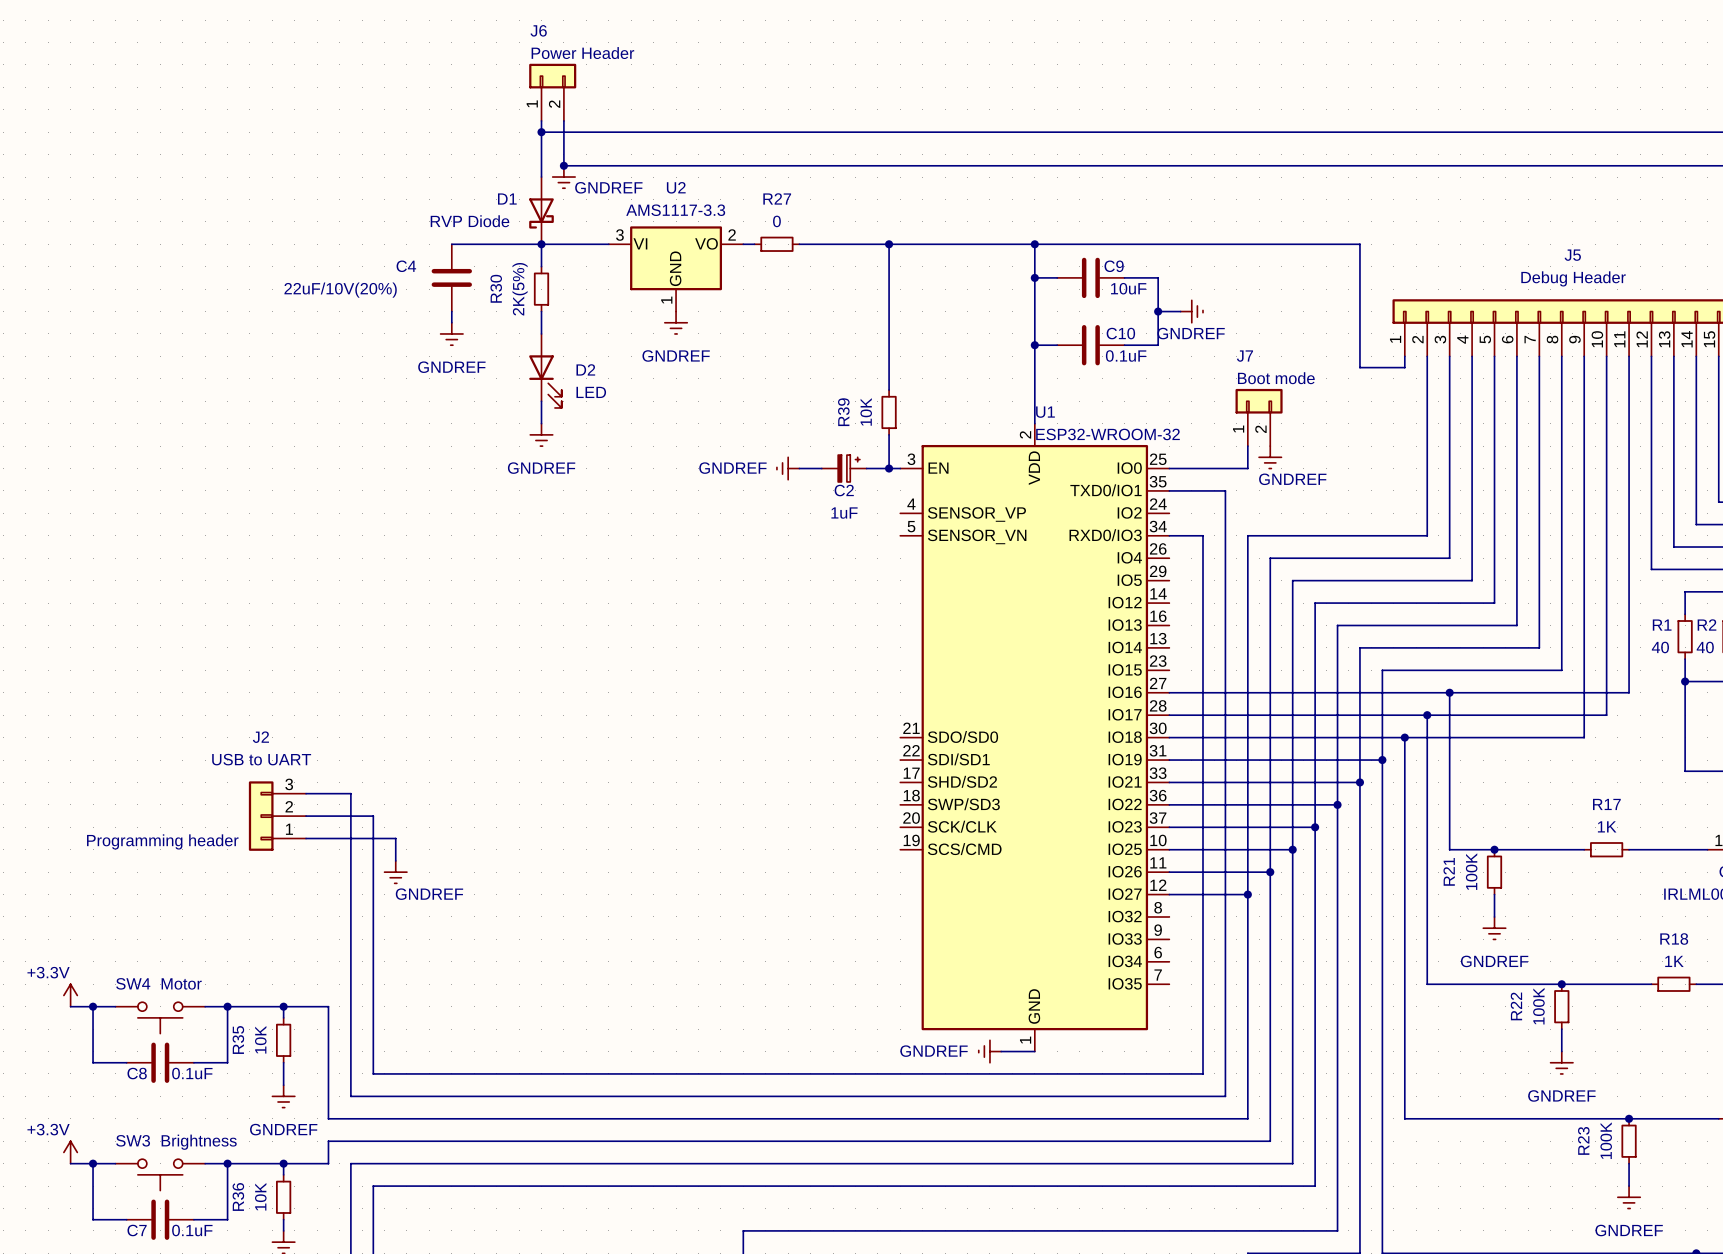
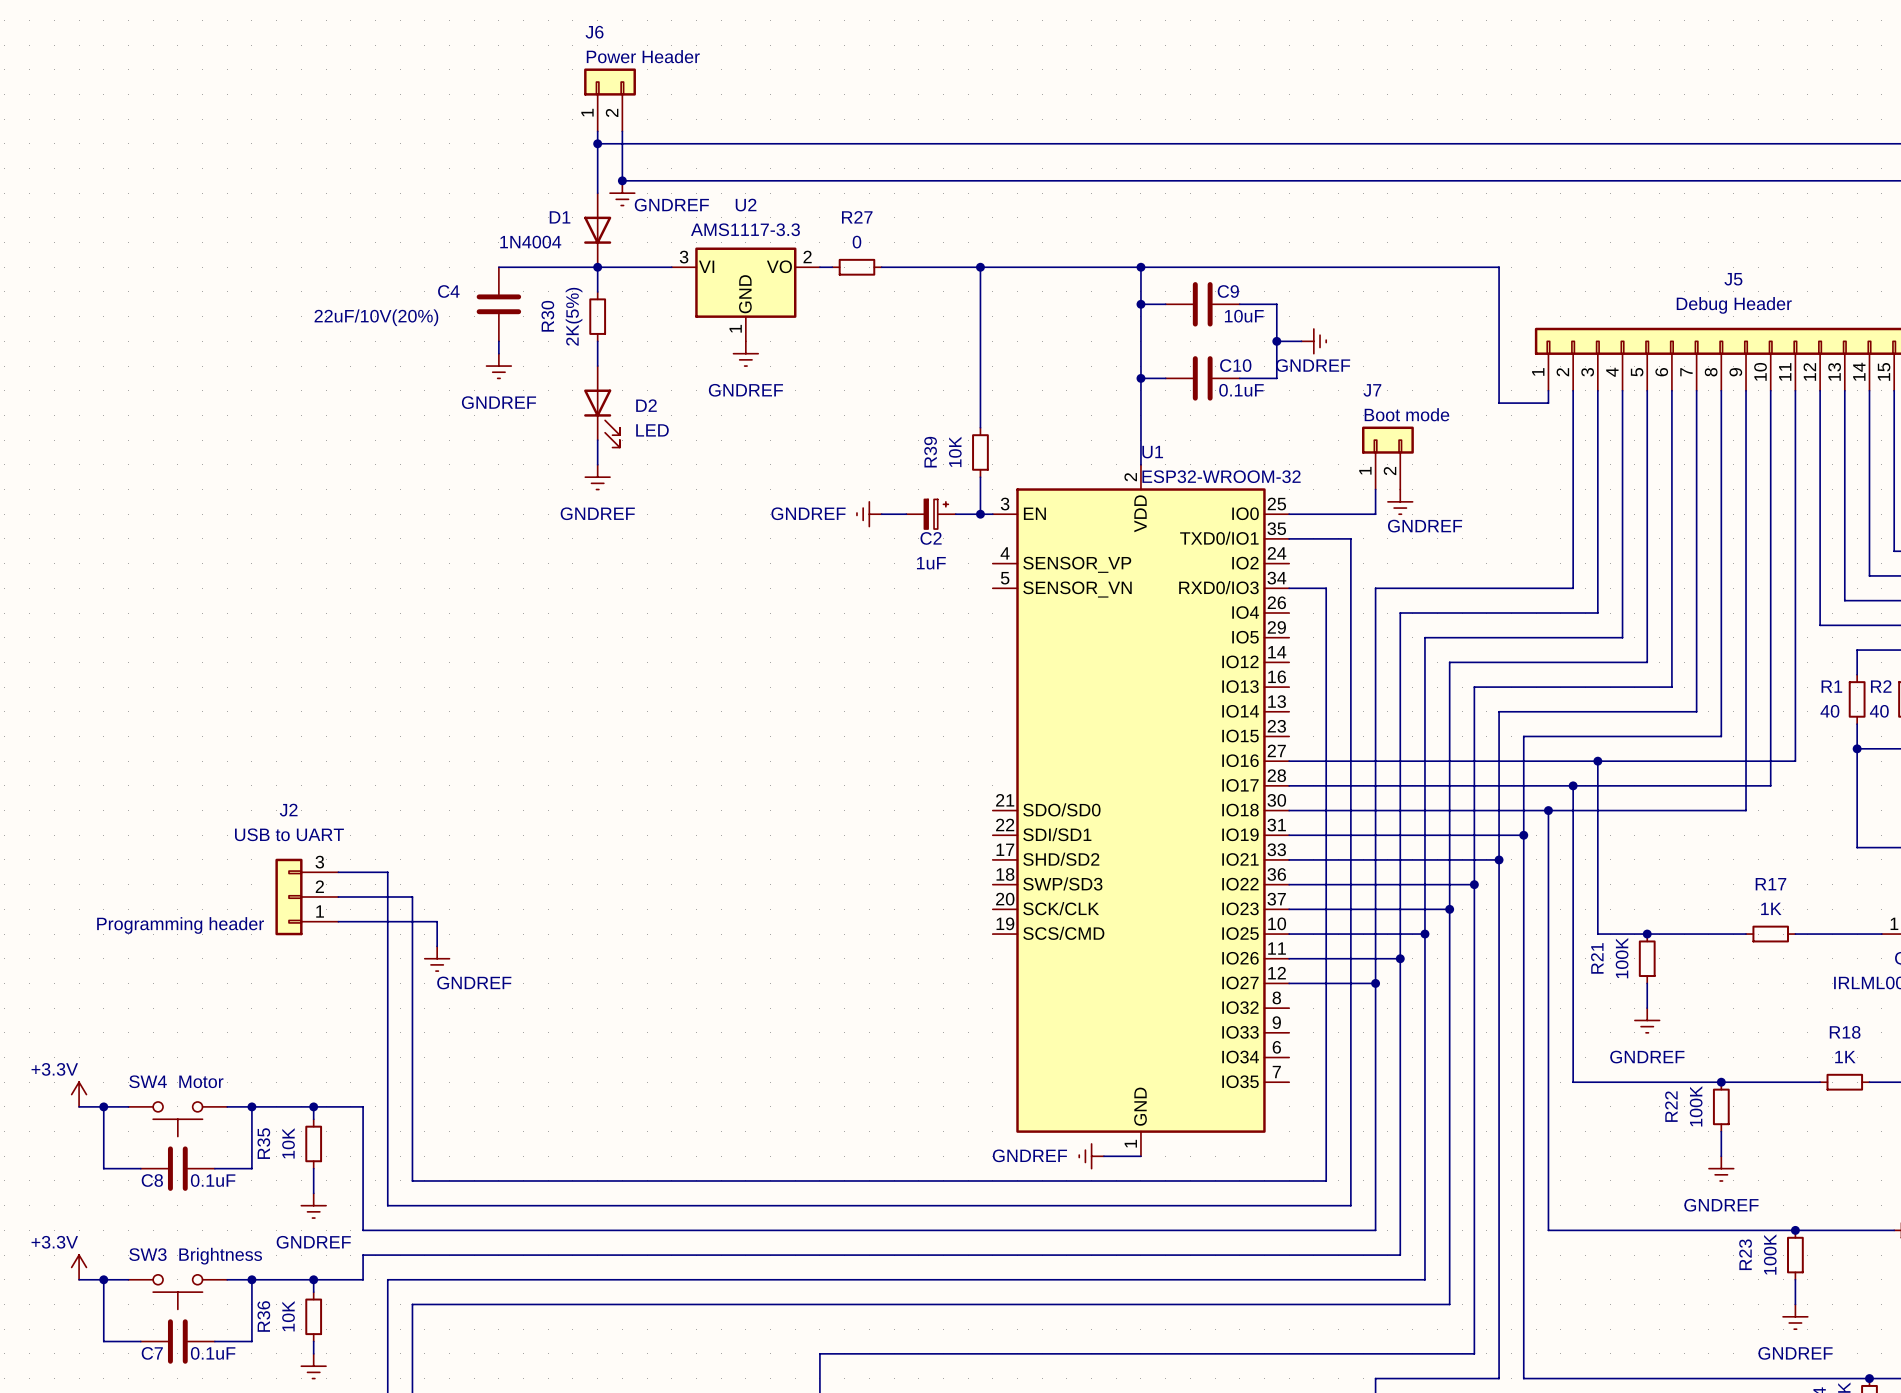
D1 symbol: [529, 177, 554, 245] -> [584, 193, 612, 268]
D1 value: RVP Diode (469, 221) -> 1N4004 (530, 242)

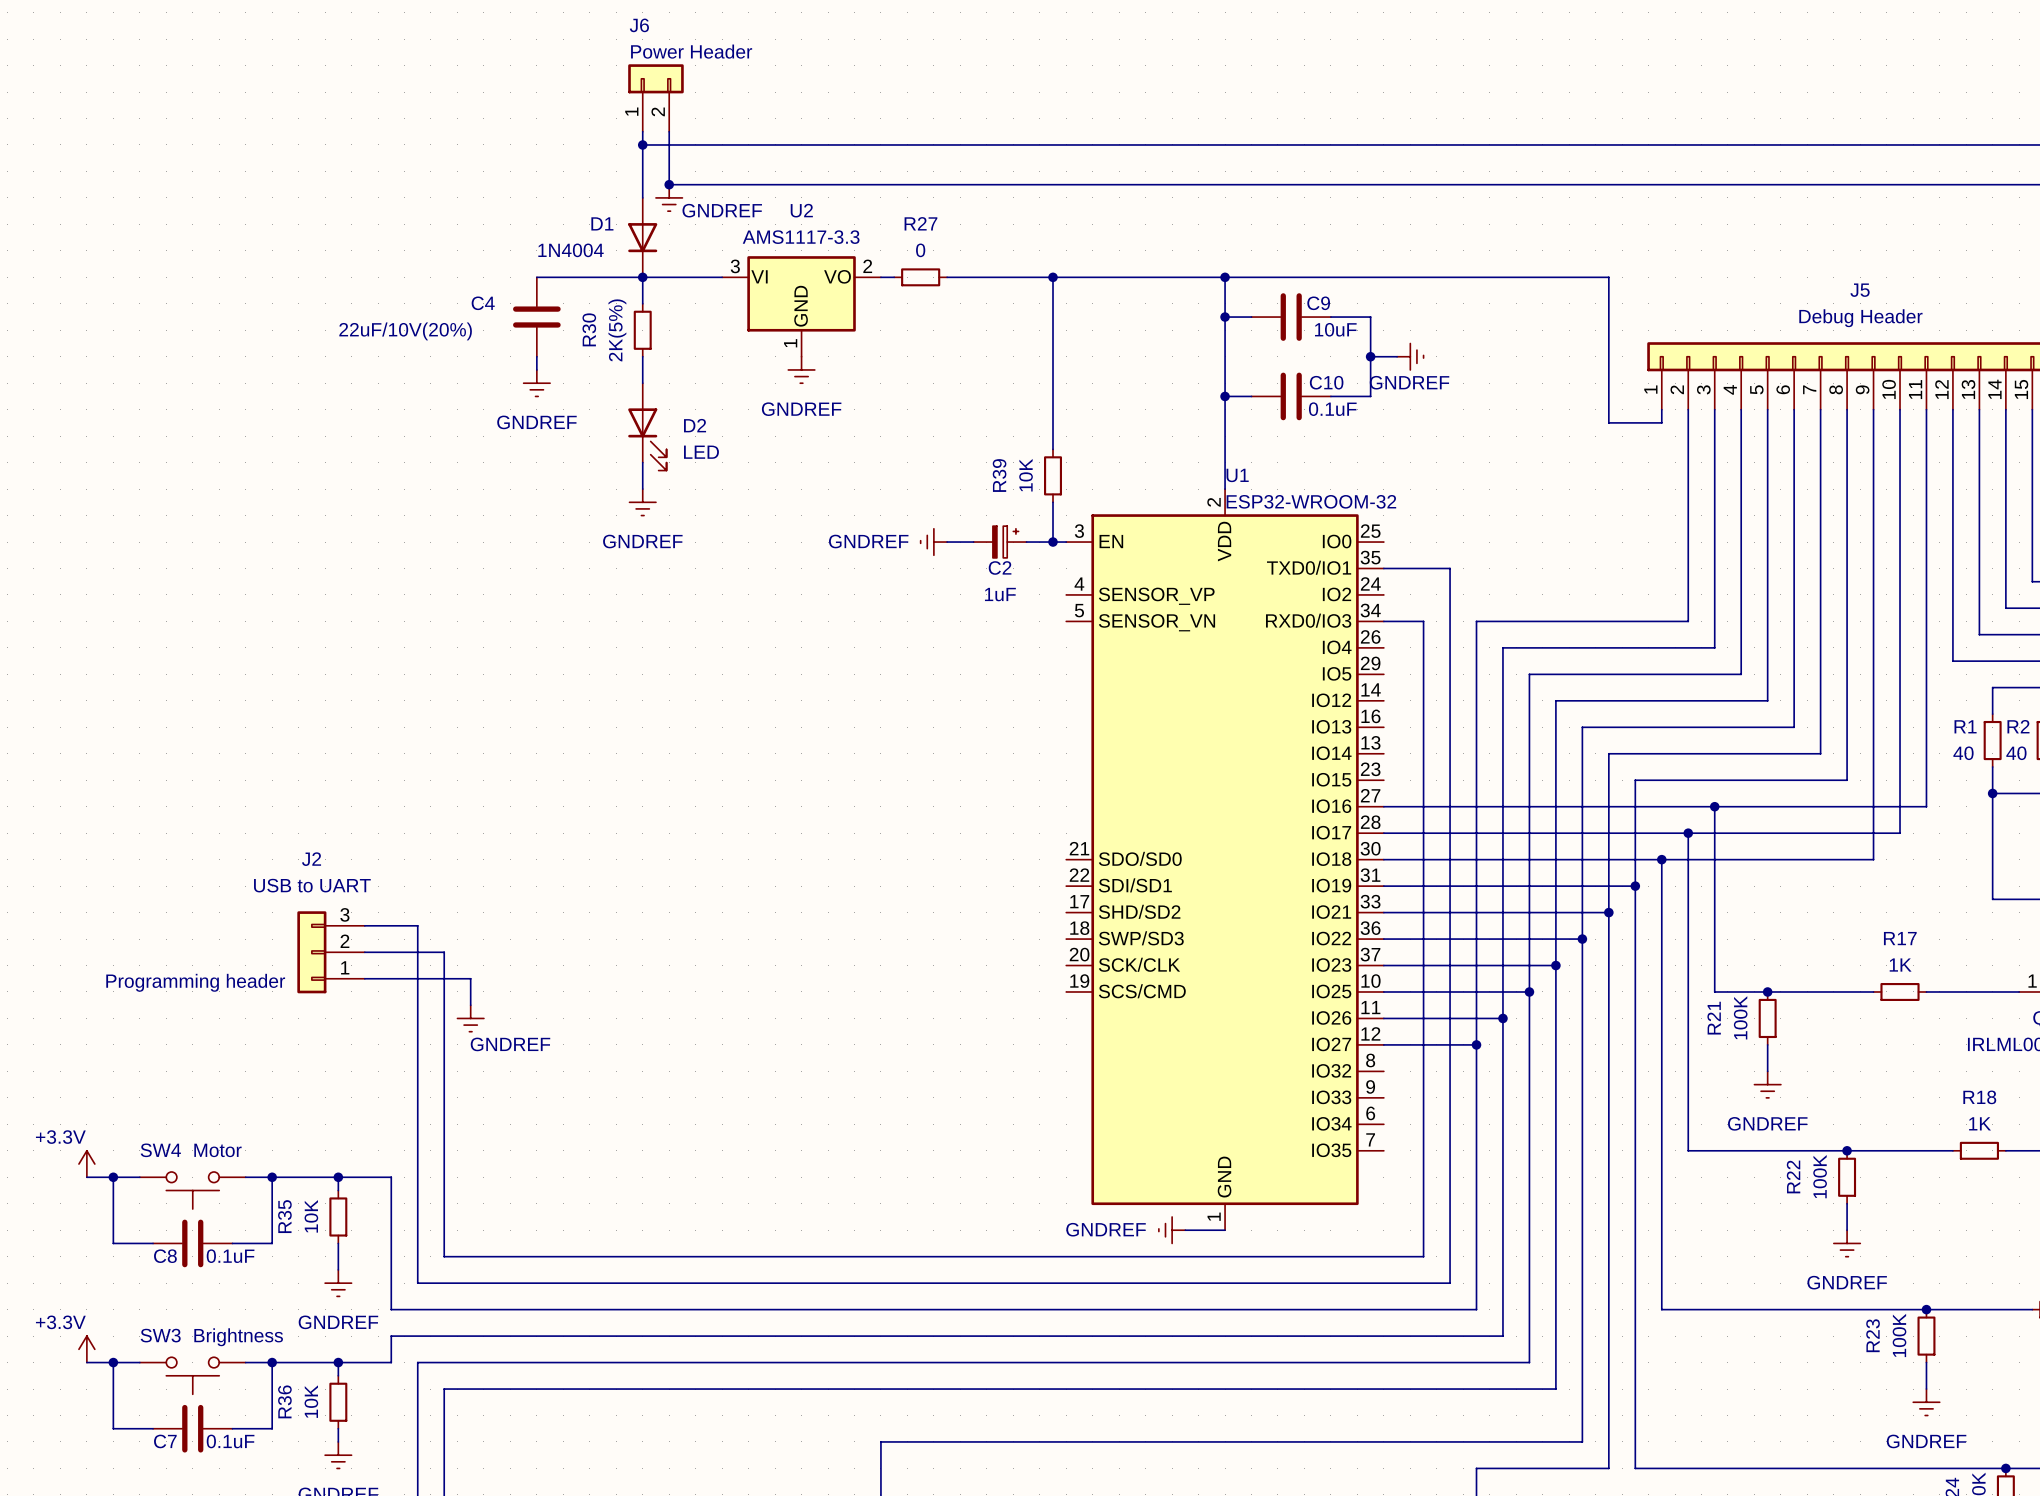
J7: Boot mode (1387, 458) -> none
wire: (1375, 489) (1375, 514) (1289, 514) -> none
power symbol: GNDREF (1400, 501) -> none

